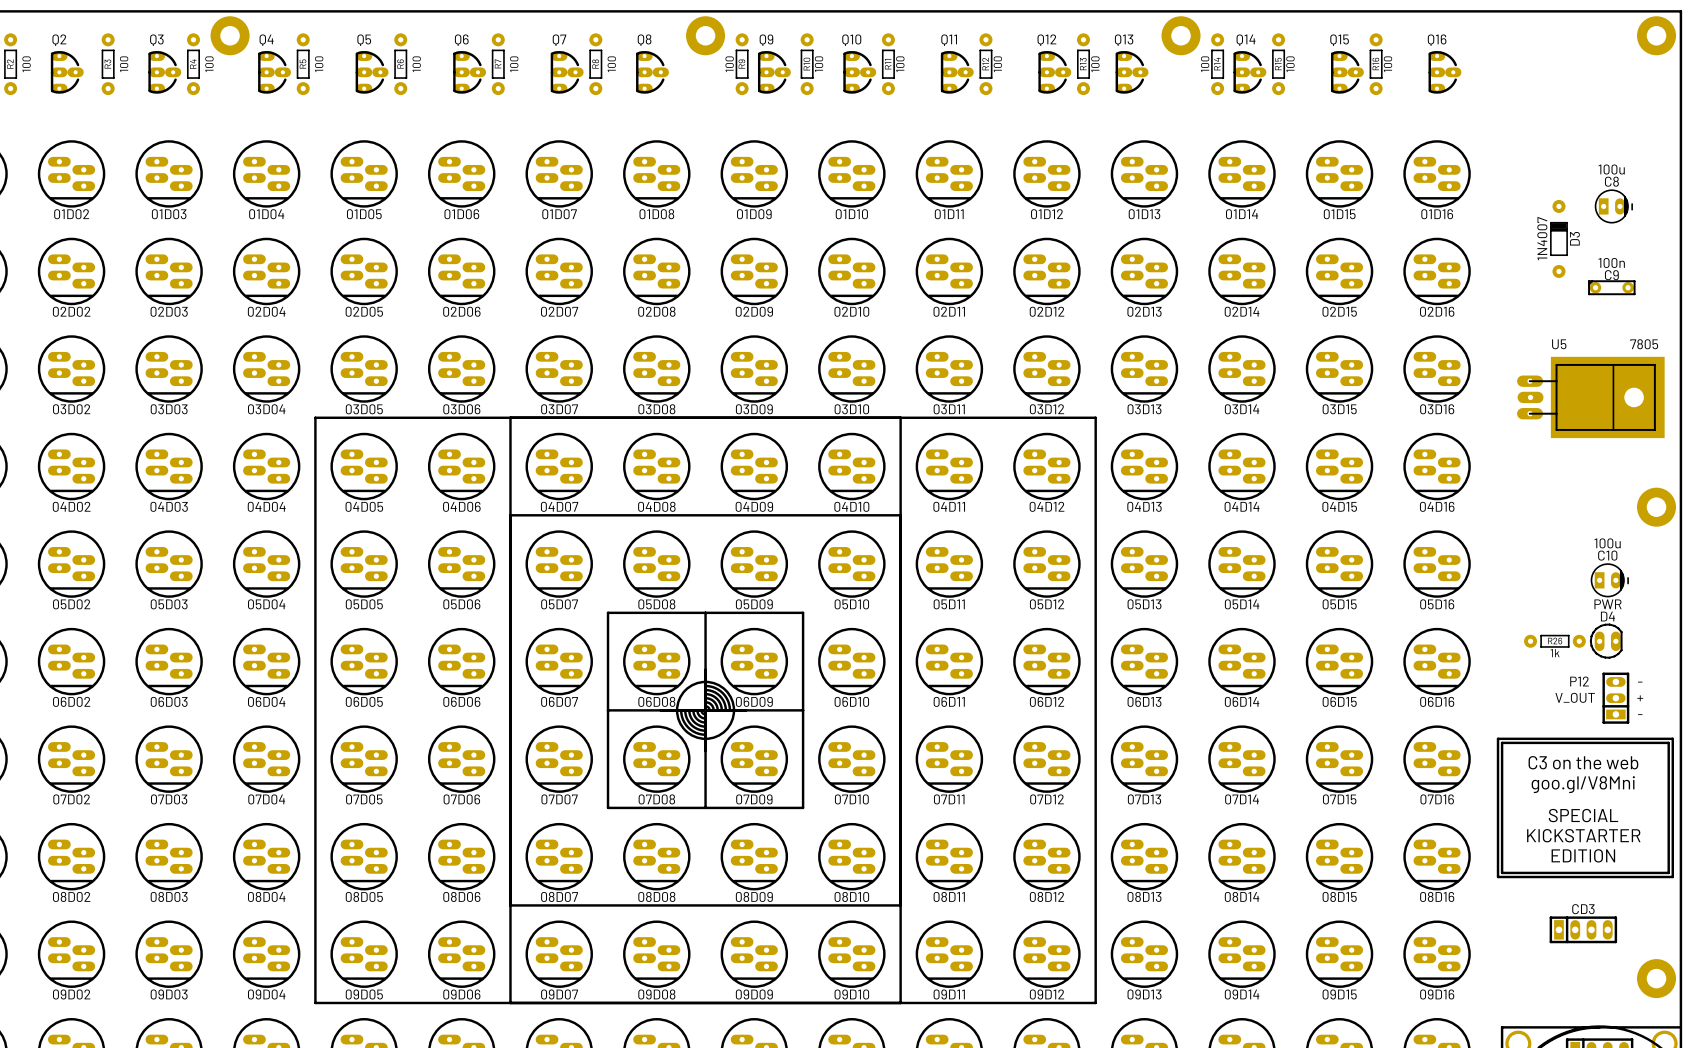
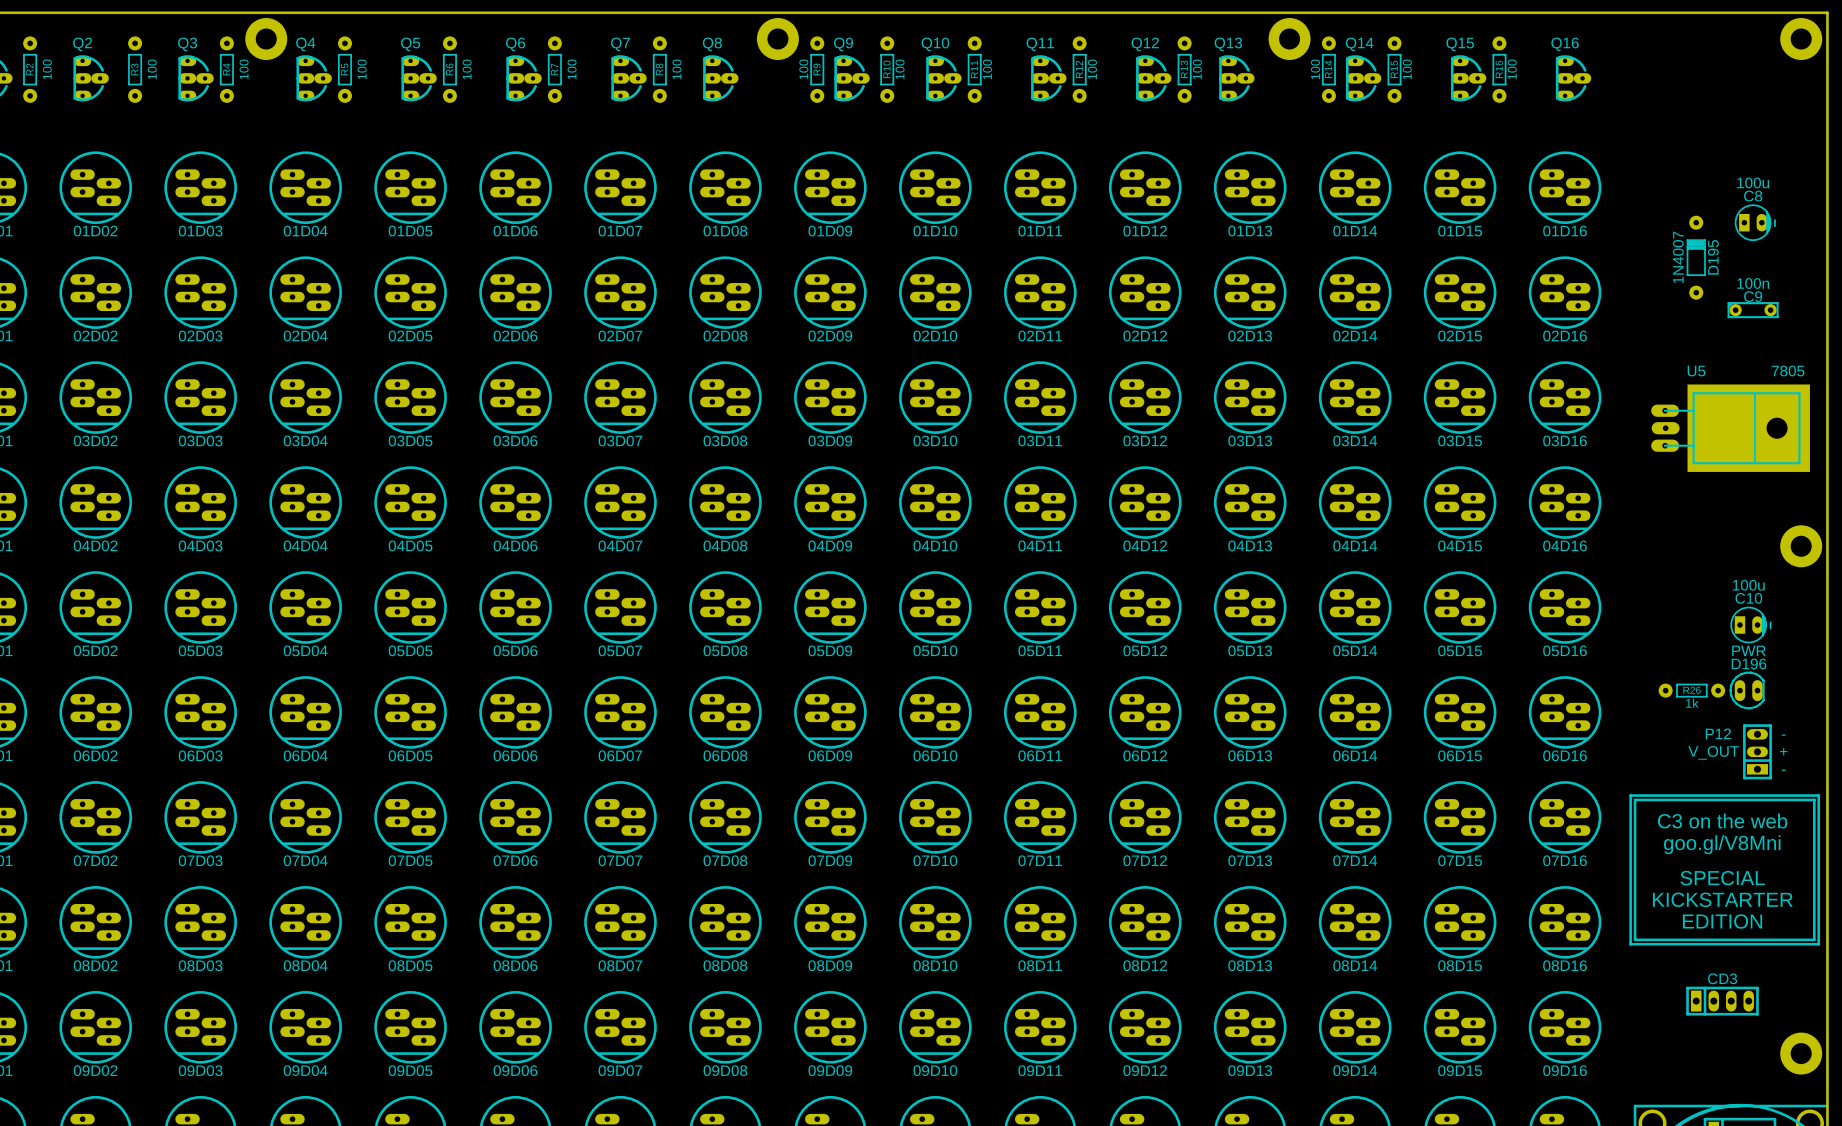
D3 name: D3 (1574, 238) -> D195 (1713, 257)
drawing: [314, 416, 1097, 1005] -> none
D4 name: D4 (1607, 616) -> D196 (1749, 663)

